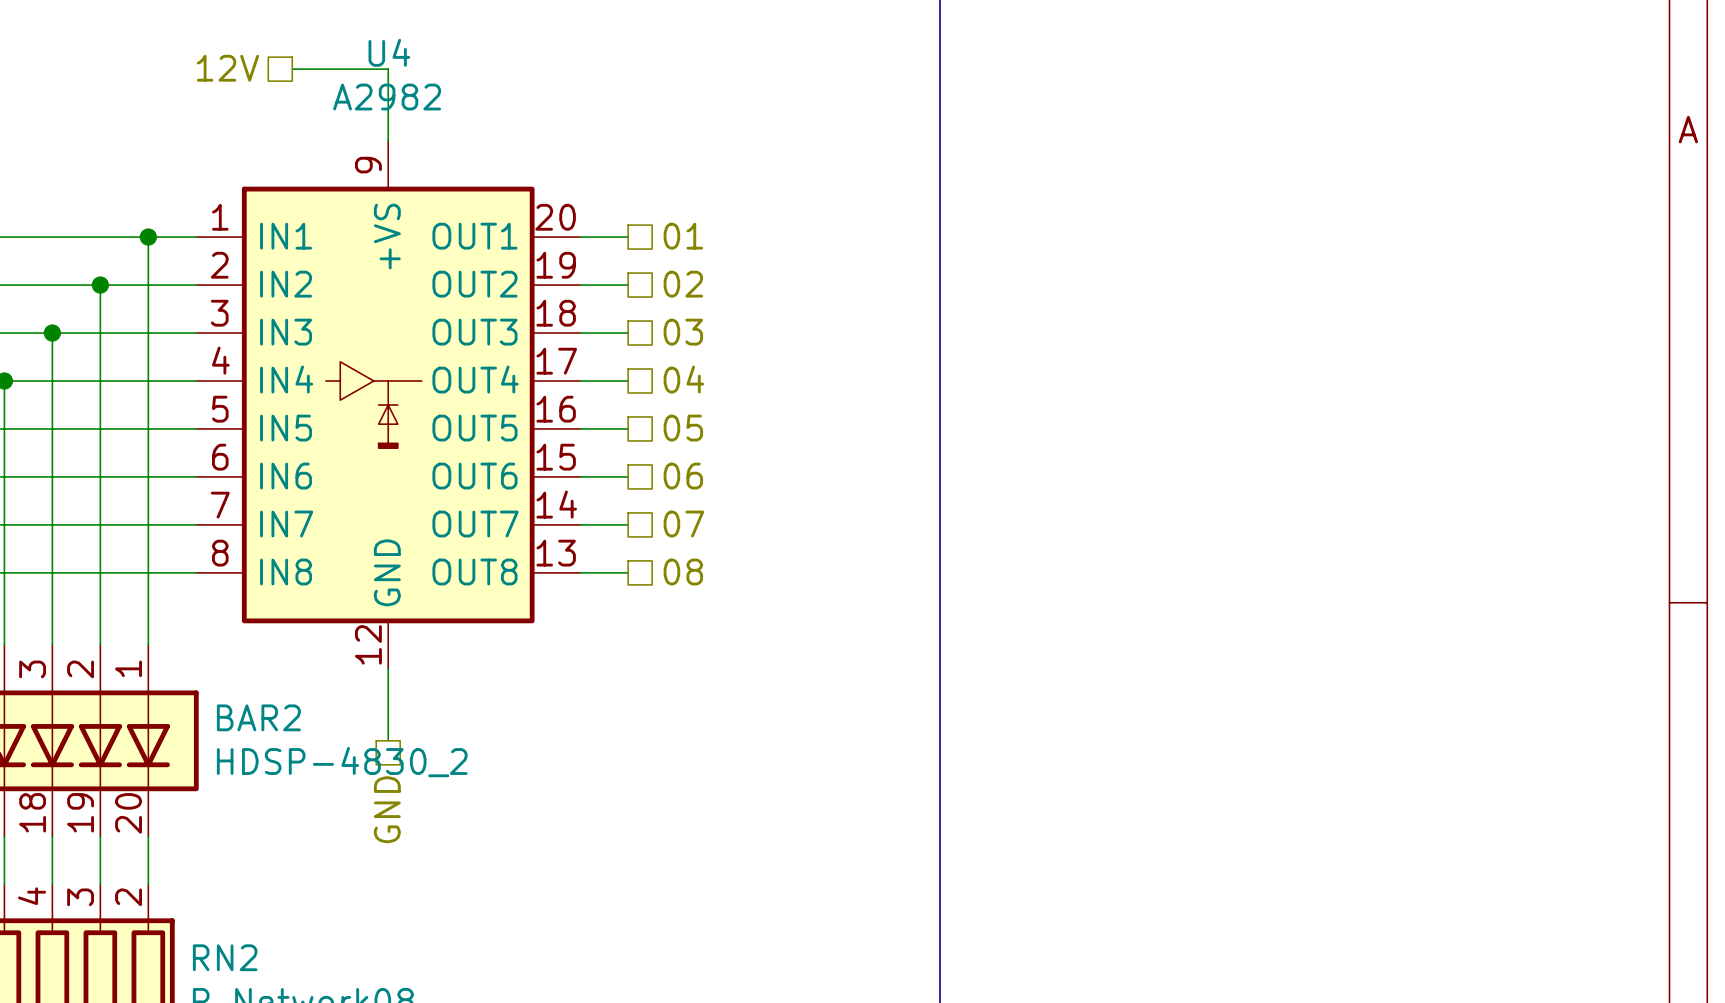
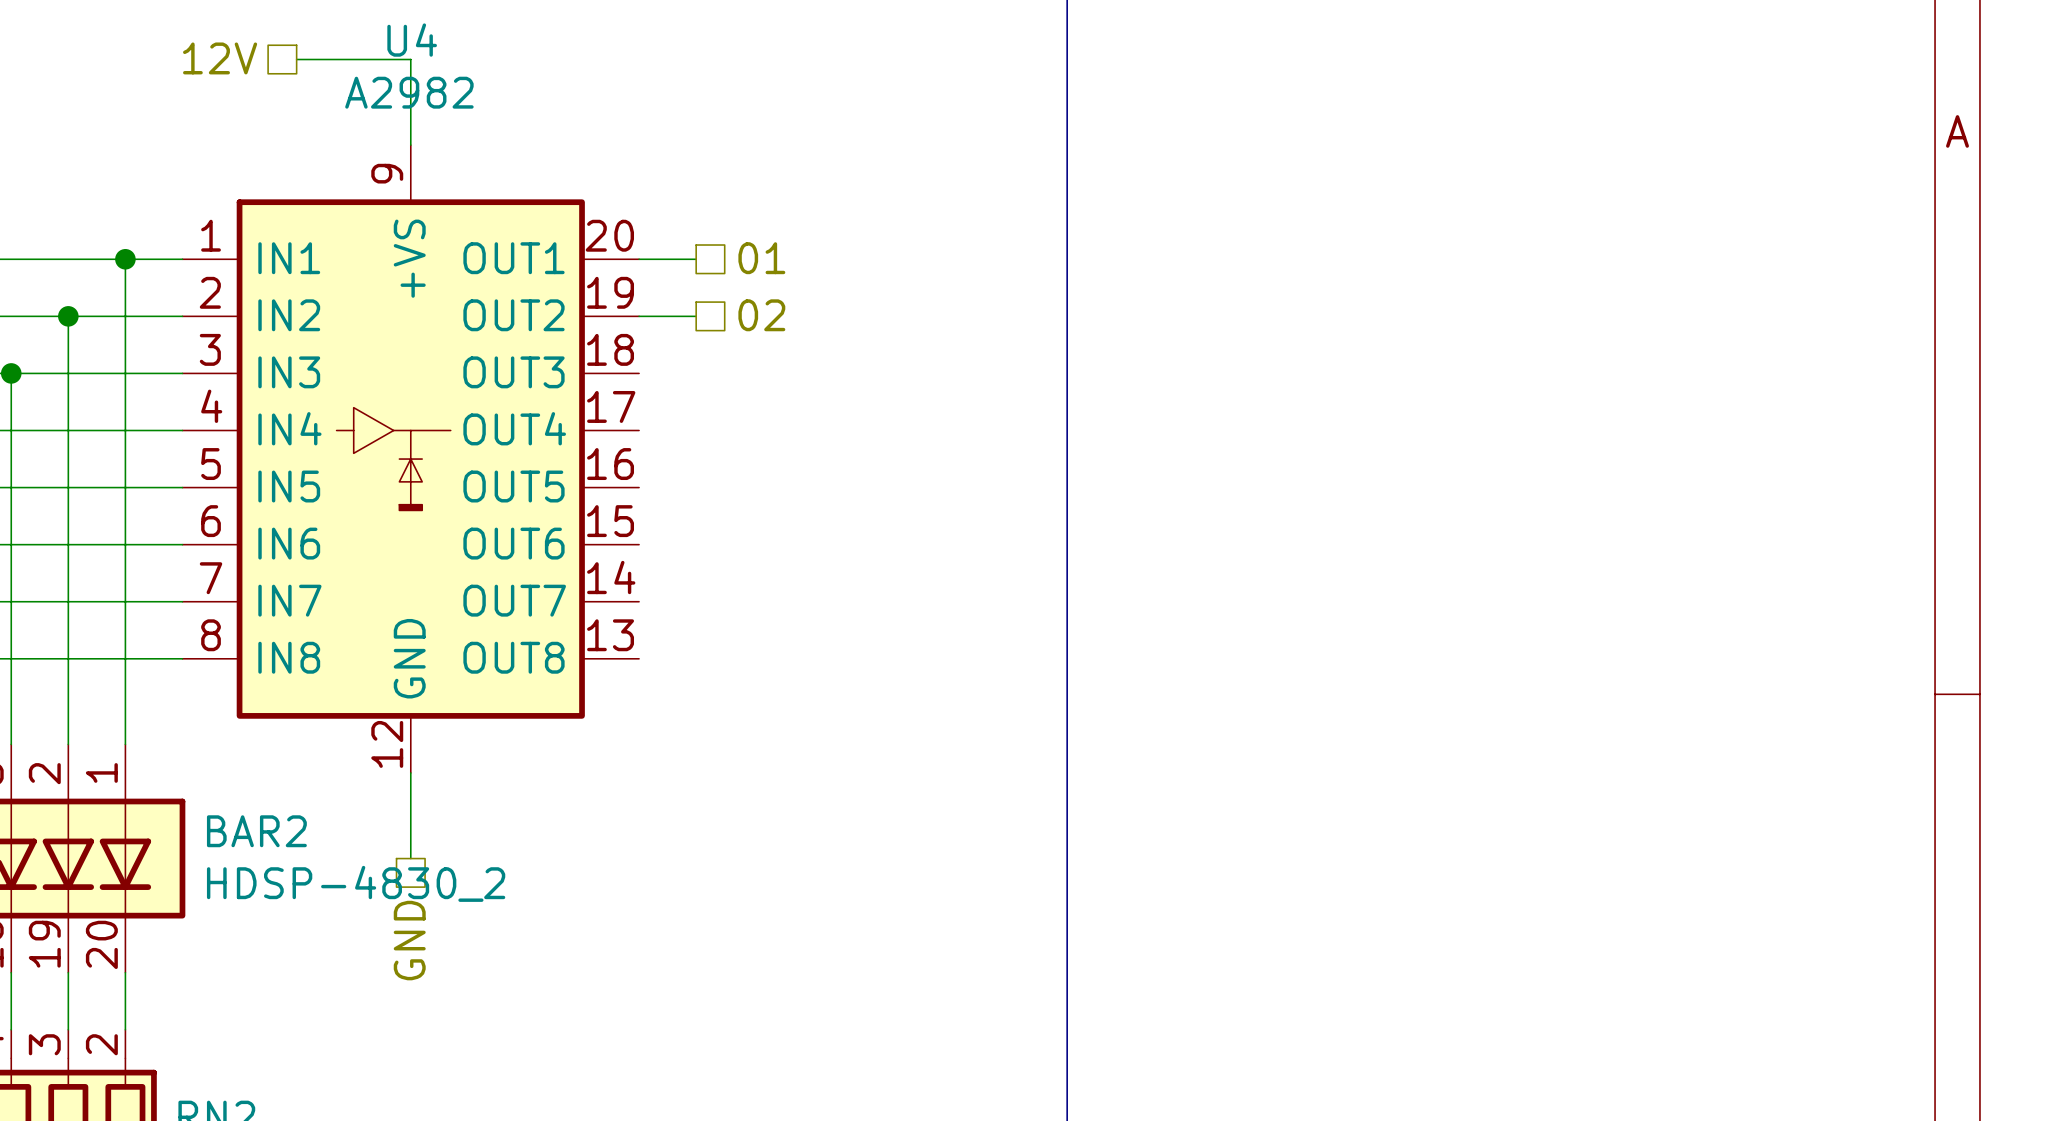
hierarchical label: 03 (683, 332) -> none
wire: (580, 333) (628, 333) -> none
hierarchical label: 04 (683, 379) -> none
wire: (580, 380) (628, 380) -> none
wire: (580, 428) (628, 428) -> none
hierarchical label: 05 (683, 428) -> none
wire: (580, 476) (628, 476) -> none
hierarchical label: 06 (683, 476) -> none
wire: (580, 524) (628, 524) -> none
hierarchical label: 07 (683, 524) -> none
wire: (580, 572) (628, 572) -> none
hierarchical label: 08 (683, 572) -> none

